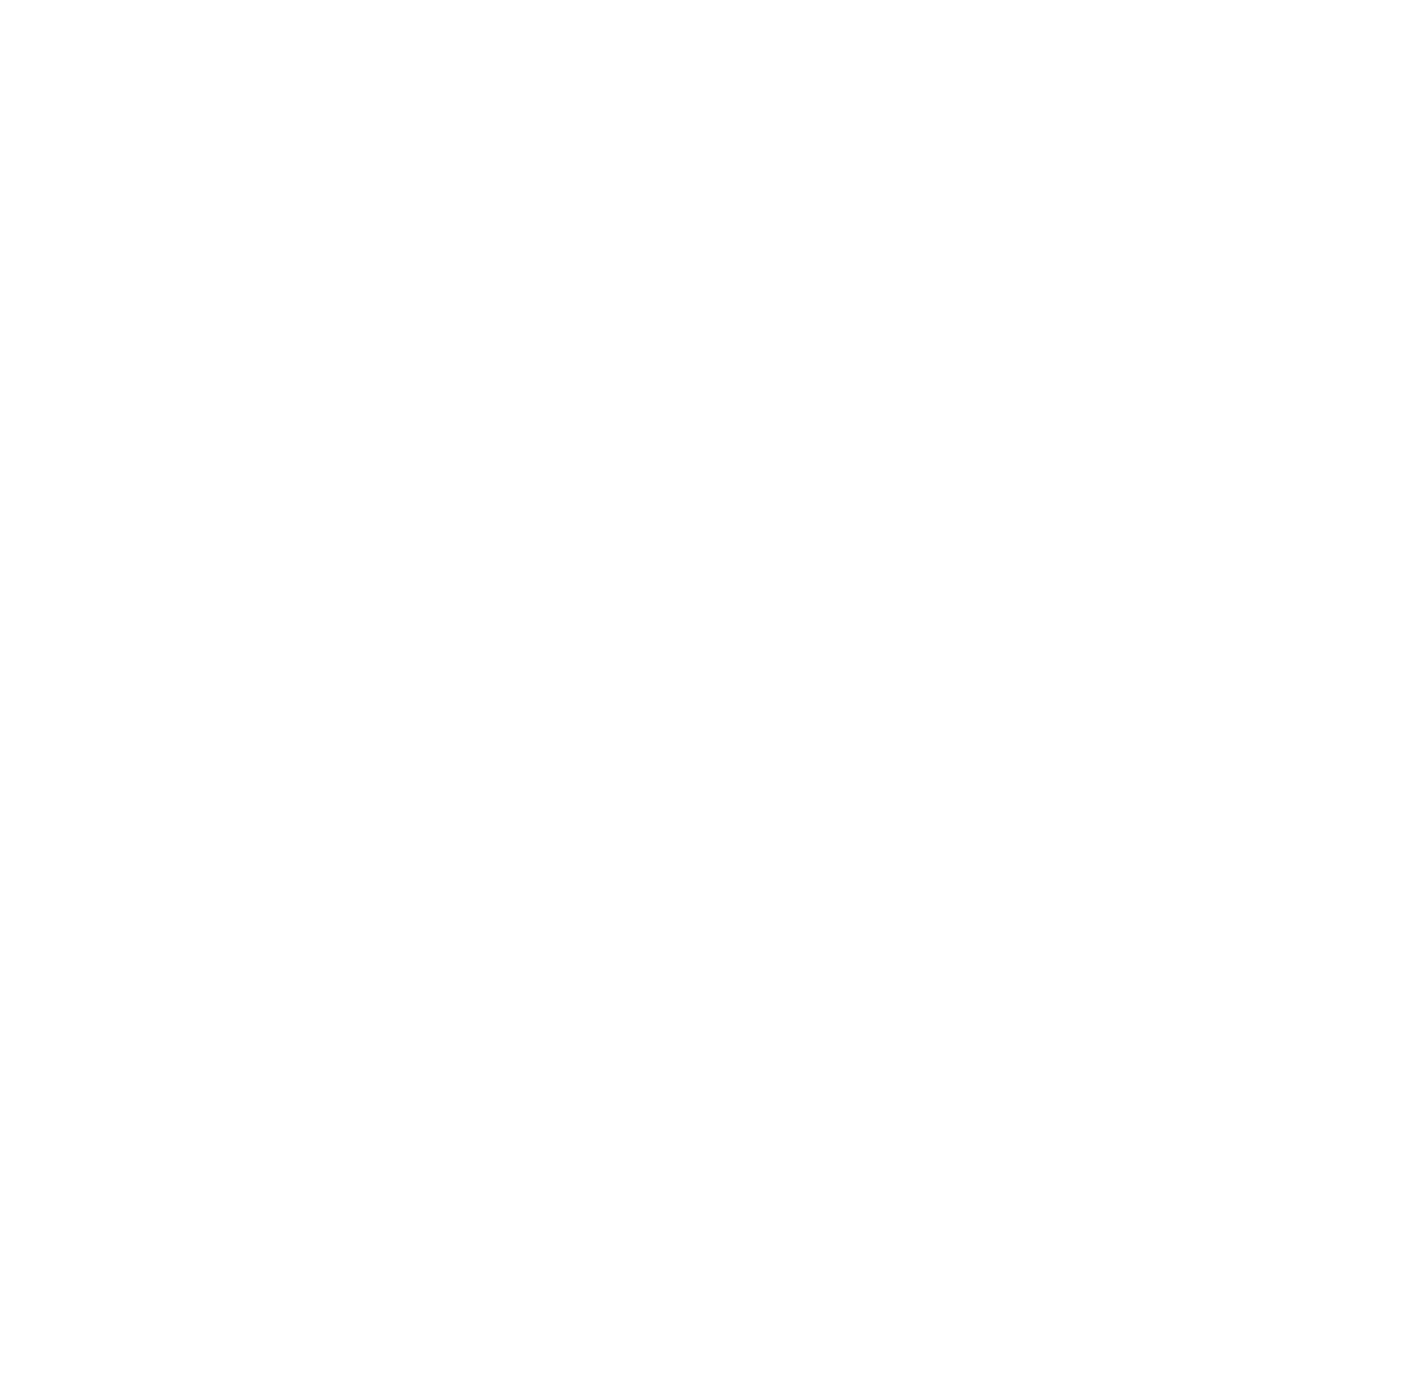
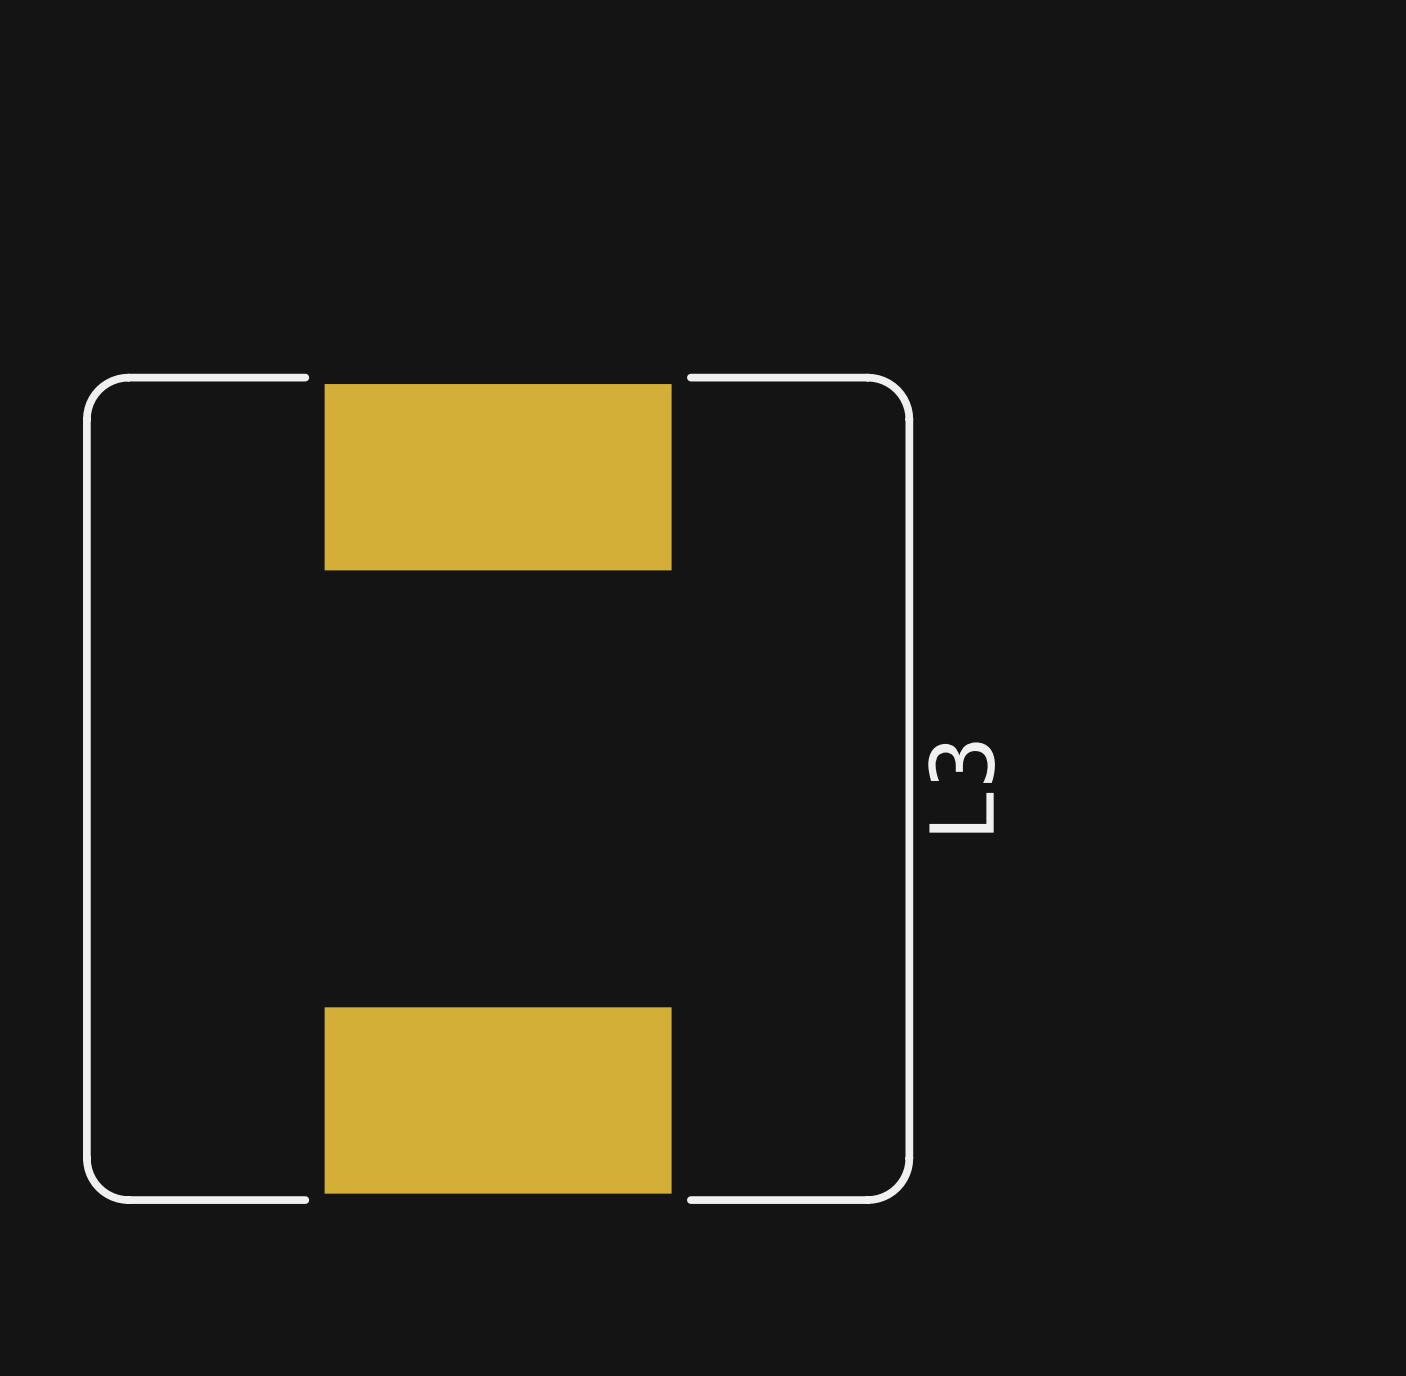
L3: none -> (498, 788)

